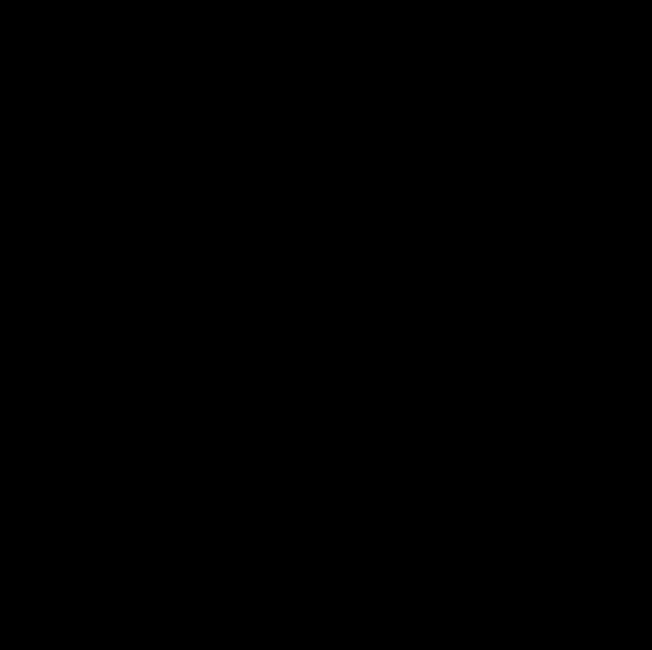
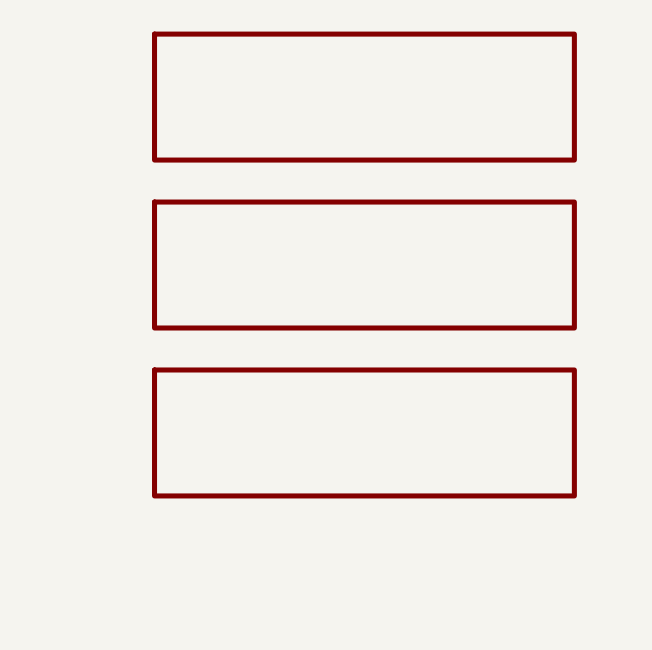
sheet: none -> (364, 97)
sheet: none -> (364, 265)
sheet: none -> (364, 432)

